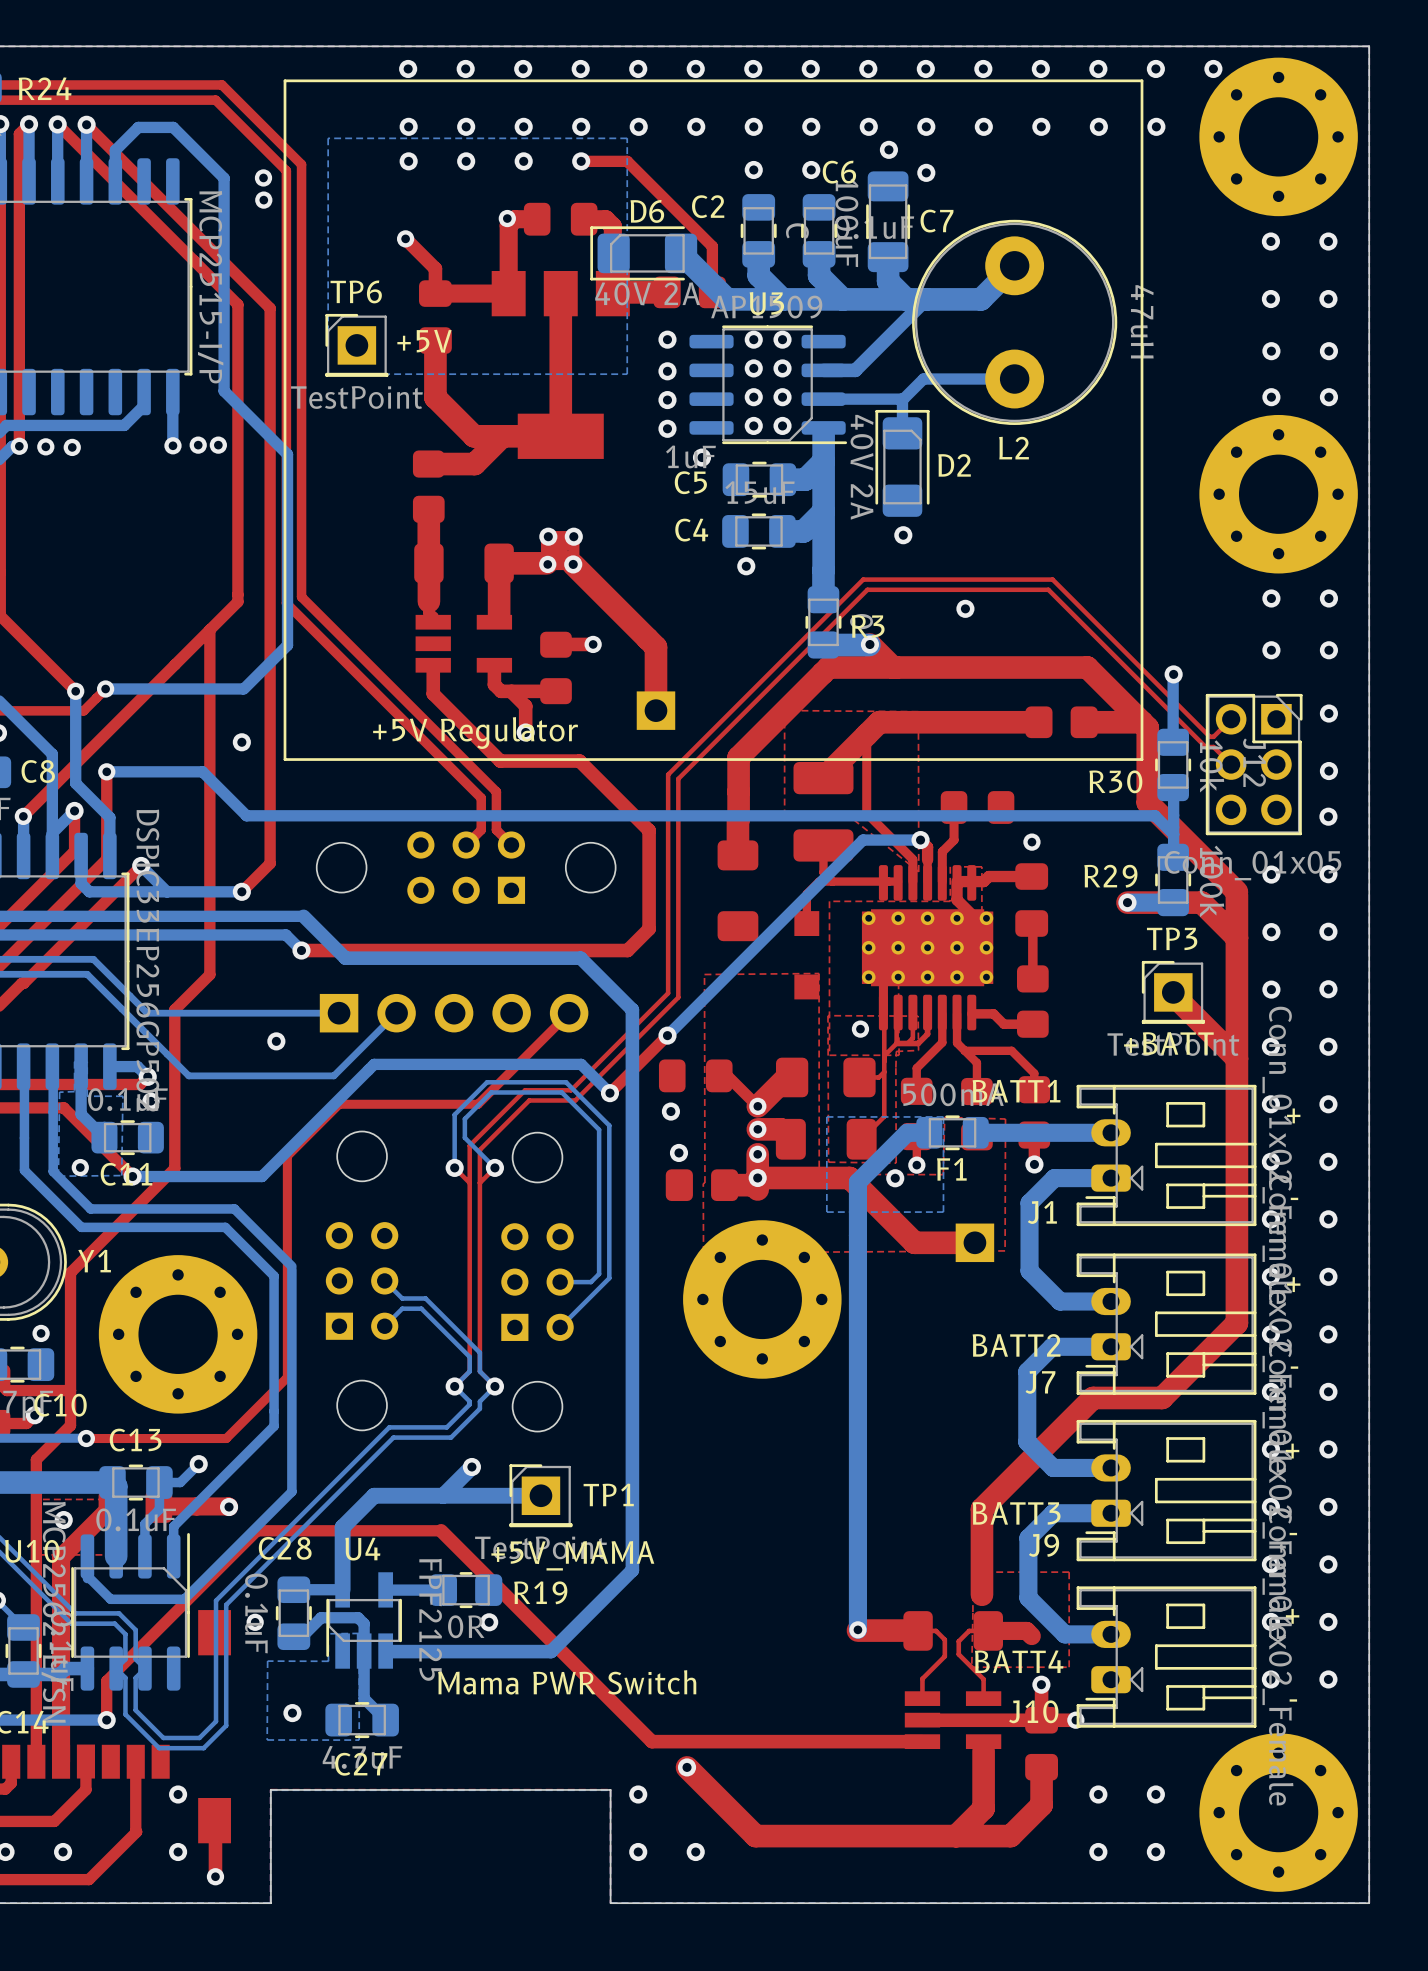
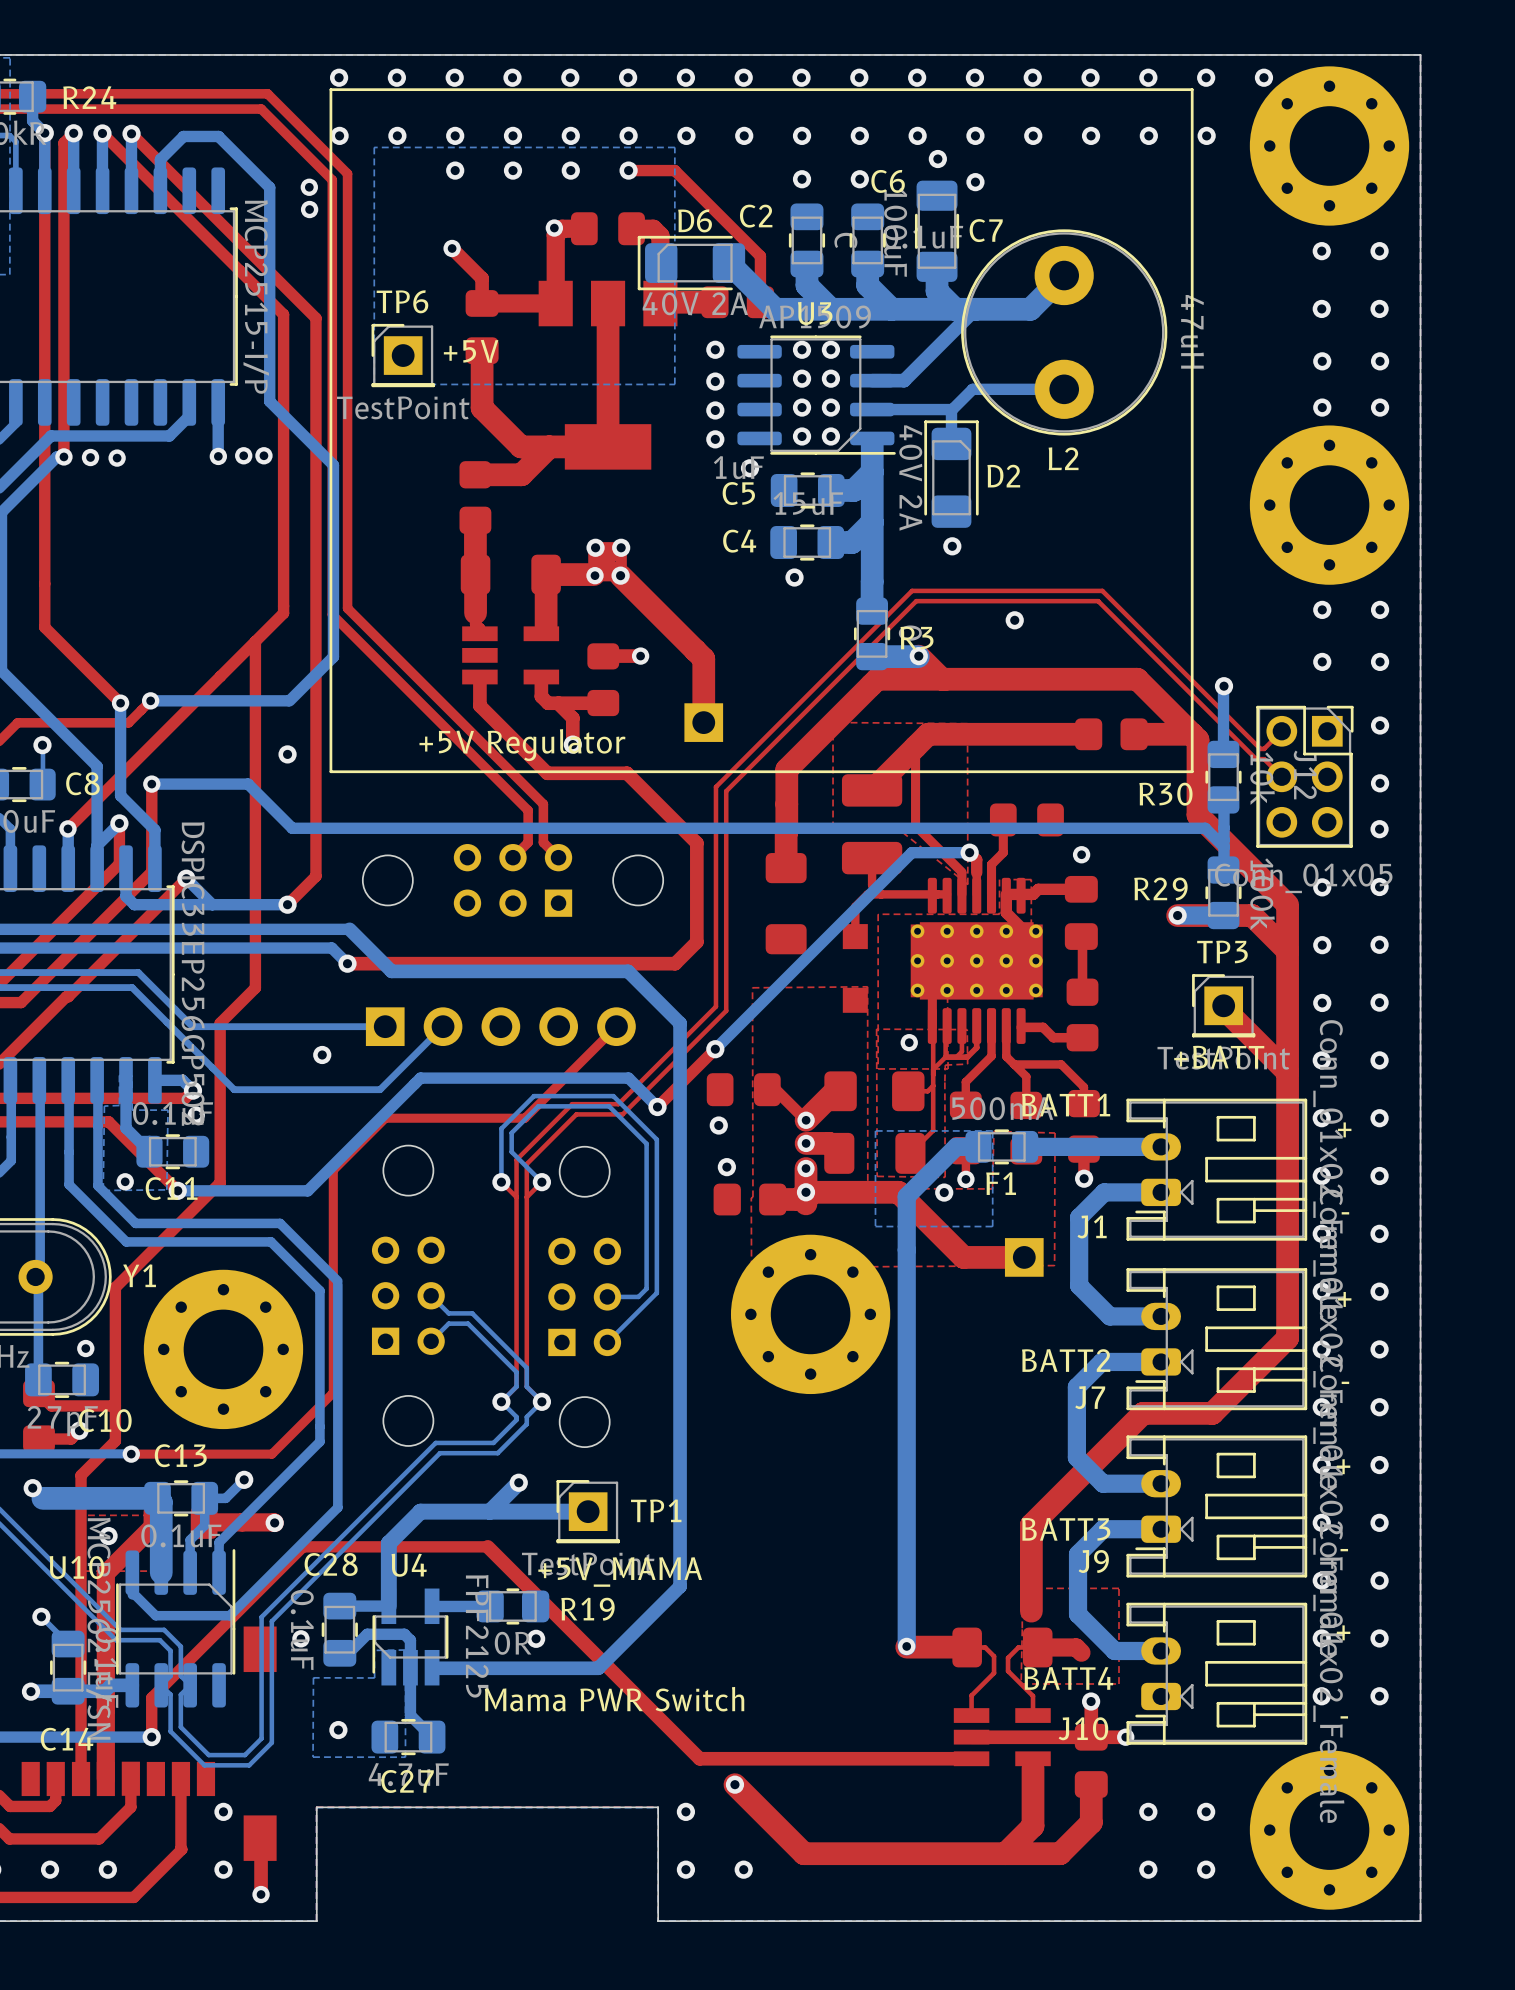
via: none -> (339, 77)
via: none -> (396, 77)
via: none -> (339, 135)
via: none -> (397, 135)

